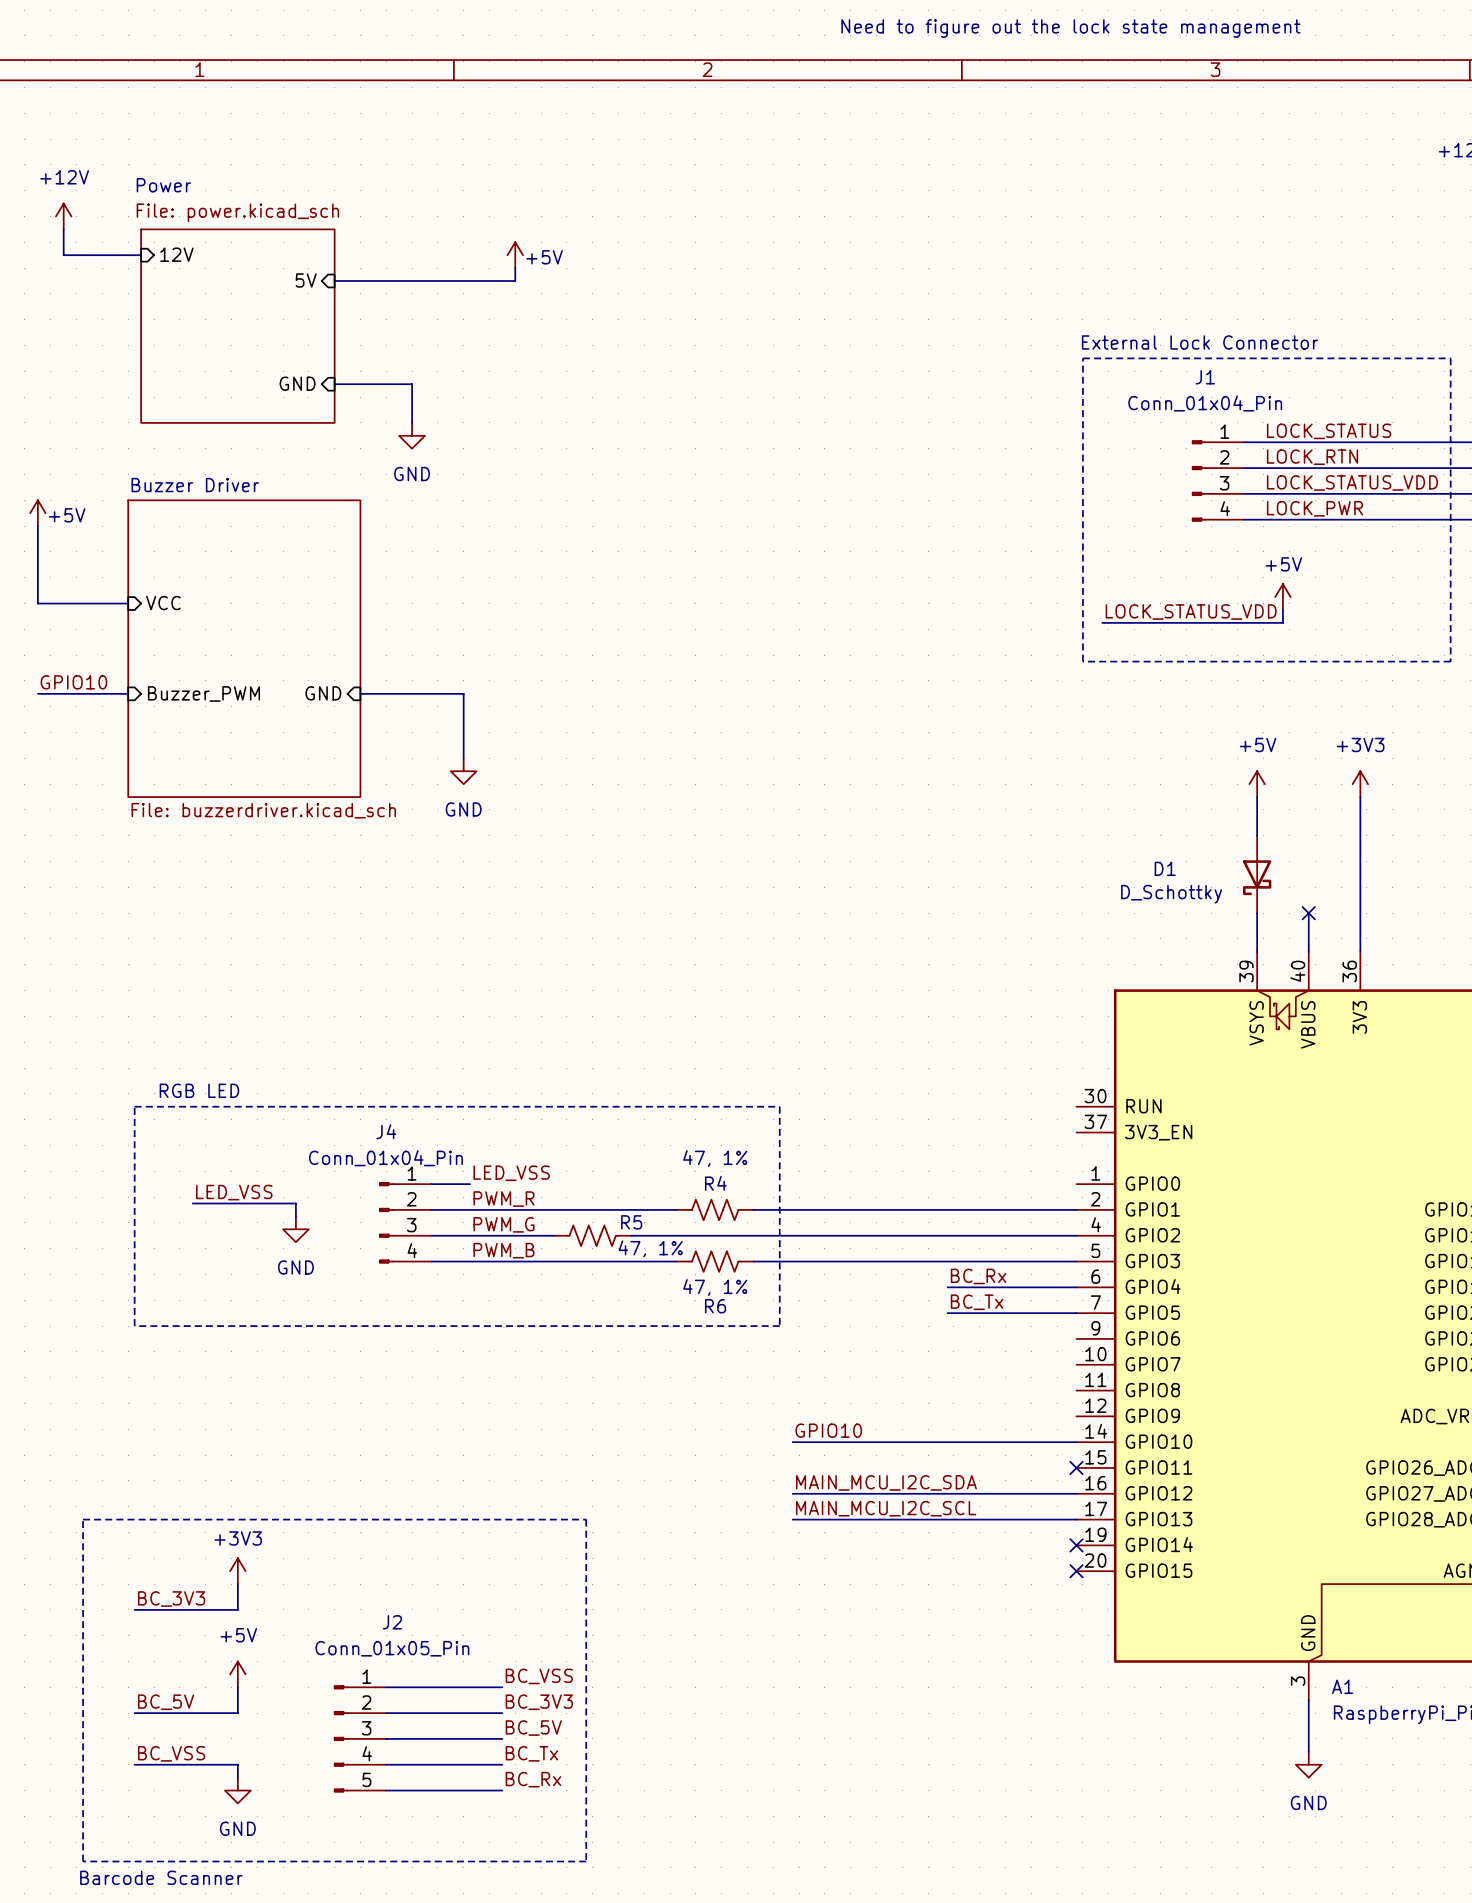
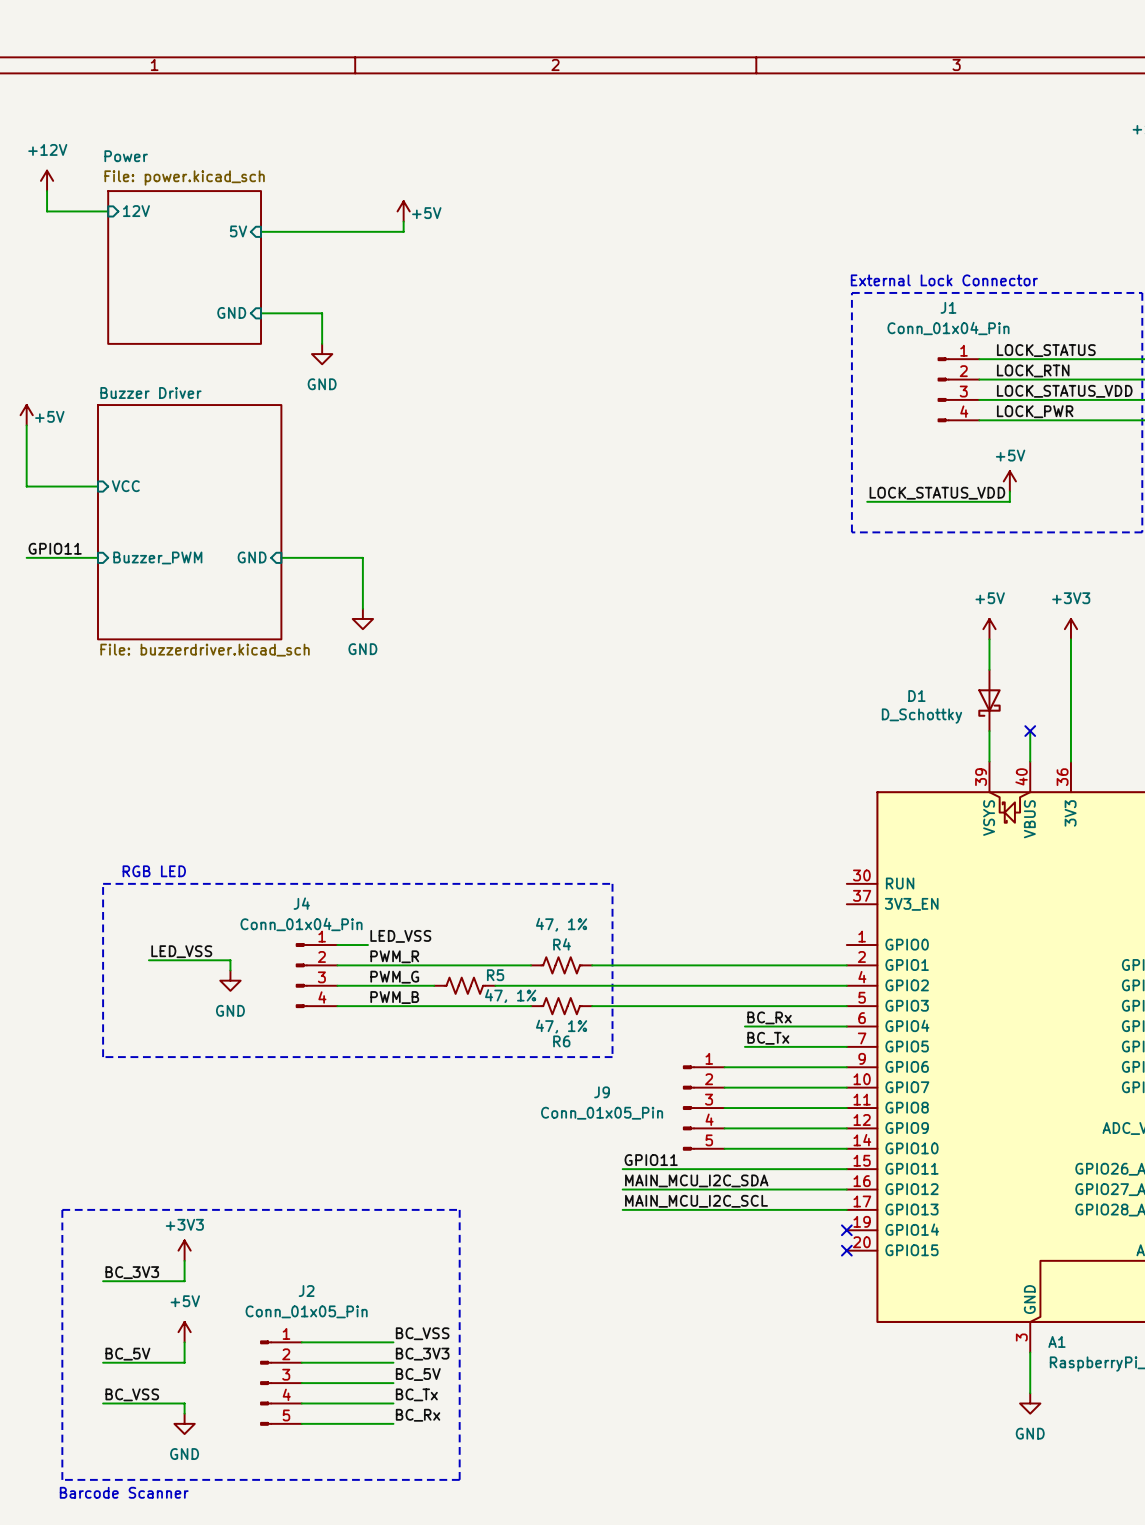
text: Need to figure out the lock state management (1070, 28) -> none
label: GPIO10 (73, 682) -> GPIO11 (55, 548)
wire: none -> (724, 1067) (846, 1067)
wire: none -> (724, 1087) (846, 1087)
J9: none -> Conn_01x05_Pin (703, 1108)
wire: none -> (724, 1108) (846, 1108)
wire: none -> (724, 1128) (846, 1128)
label: GPIO10 (828, 1430) -> GPIO11 (651, 1160)
wire: (792, 1442) (921, 1442) -> none
wire: none -> (622, 1169) (846, 1169)
no-connect mark: (1076, 1467) -> none

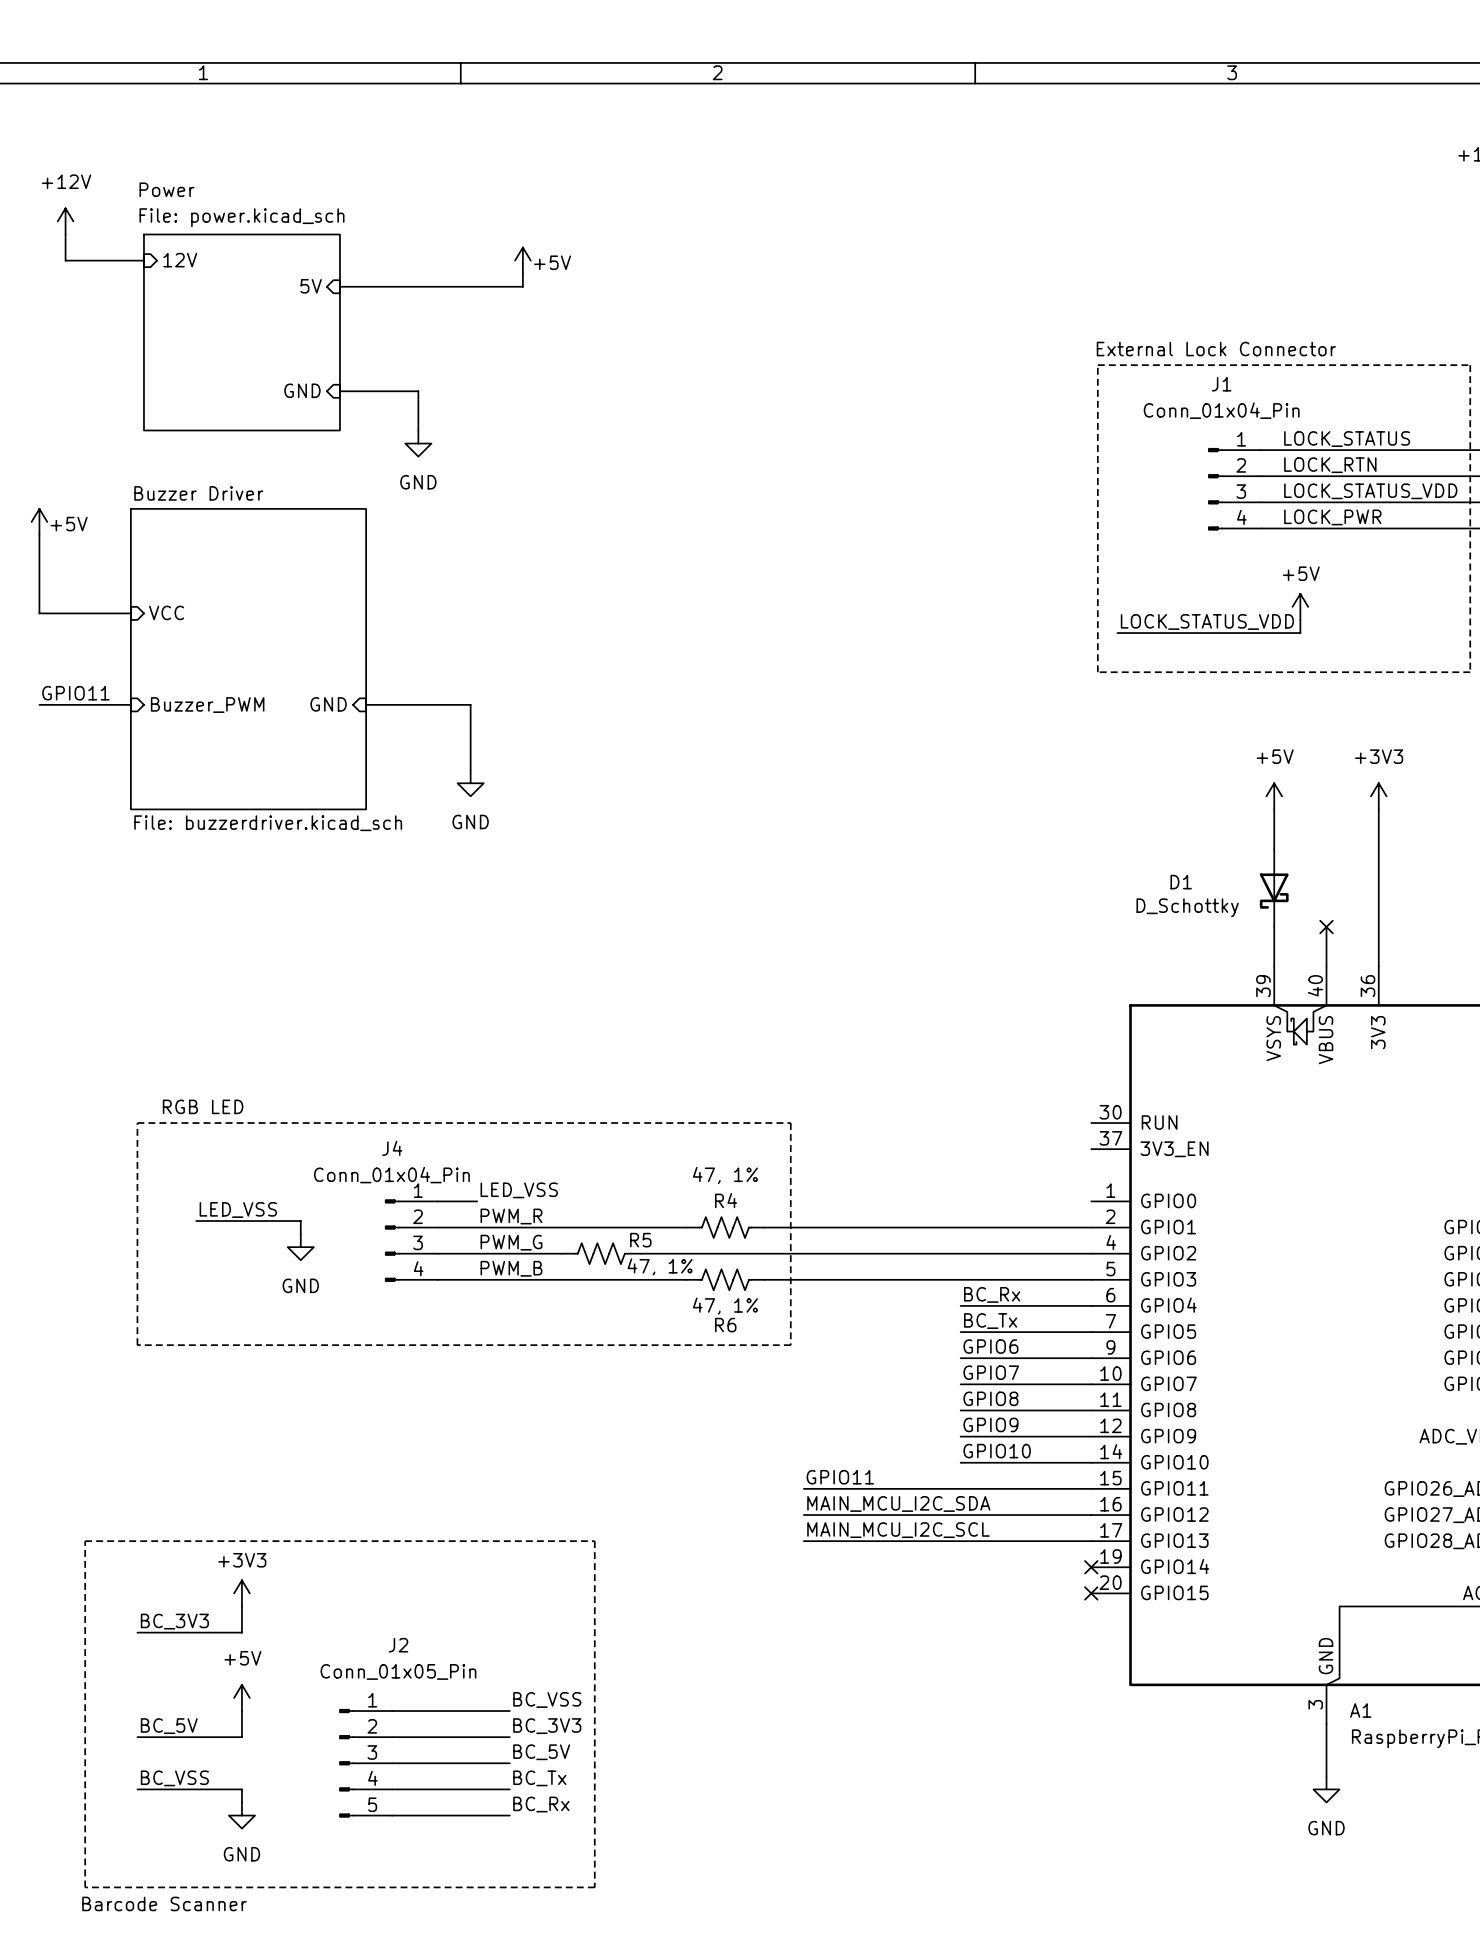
label: none -> GPIO6 (990, 1346)
wire: (724, 1067) (744, 1067) -> none
label: none -> GPIO7 (991, 1372)
wire: (724, 1087) (744, 1087) -> none
label: none -> GPIO8 (990, 1398)
J9: Conn_01x05_Pin (703, 1108) -> none
wire: (724, 1108) (744, 1108) -> none
label: none -> GPIO9 (990, 1424)
wire: (724, 1128) (744, 1128) -> none
label: none -> GPIO10 (997, 1451)
wire: (724, 1148) (744, 1148) -> none

